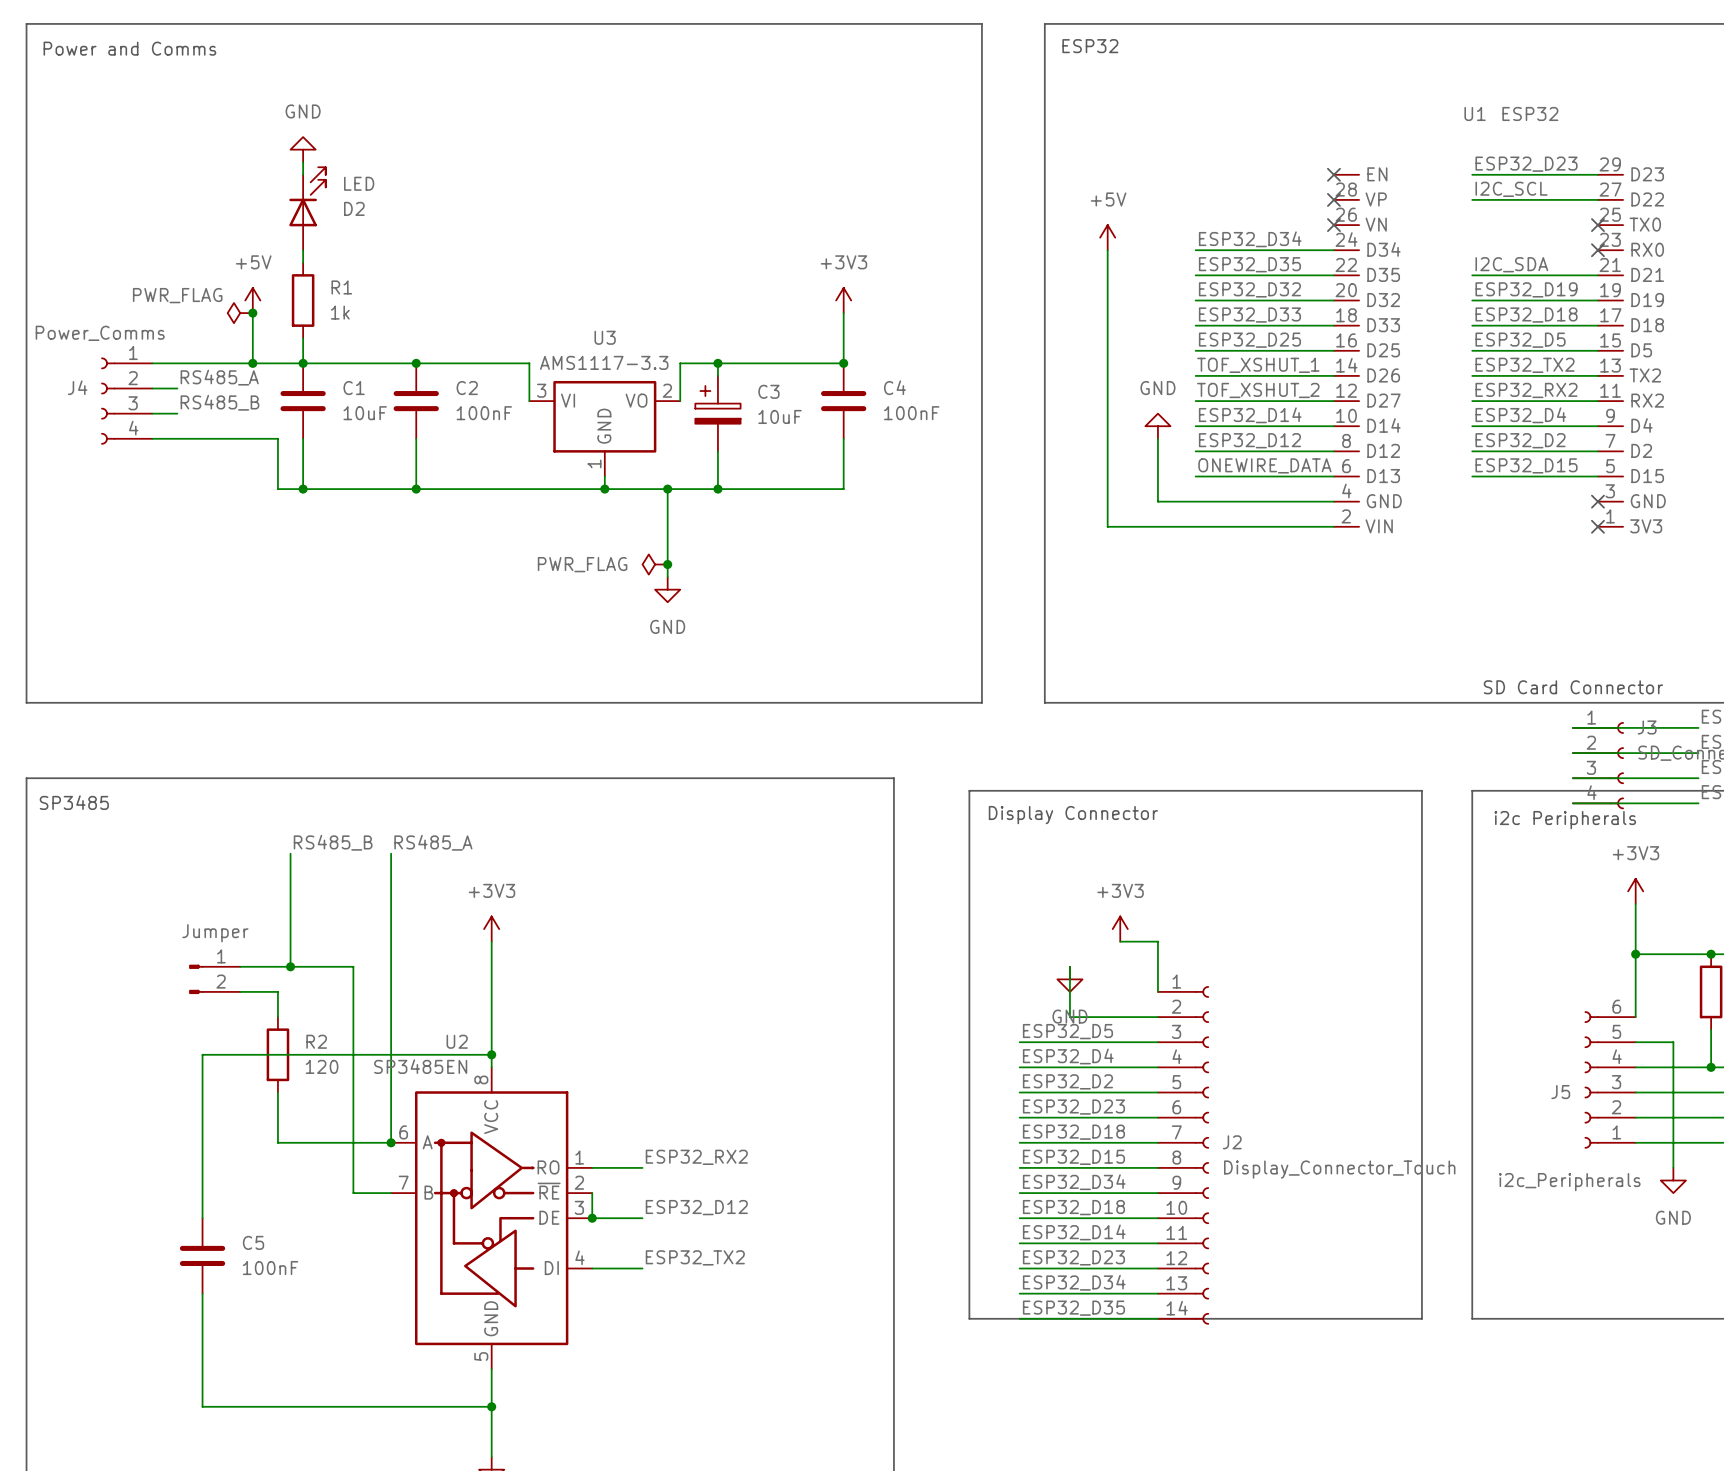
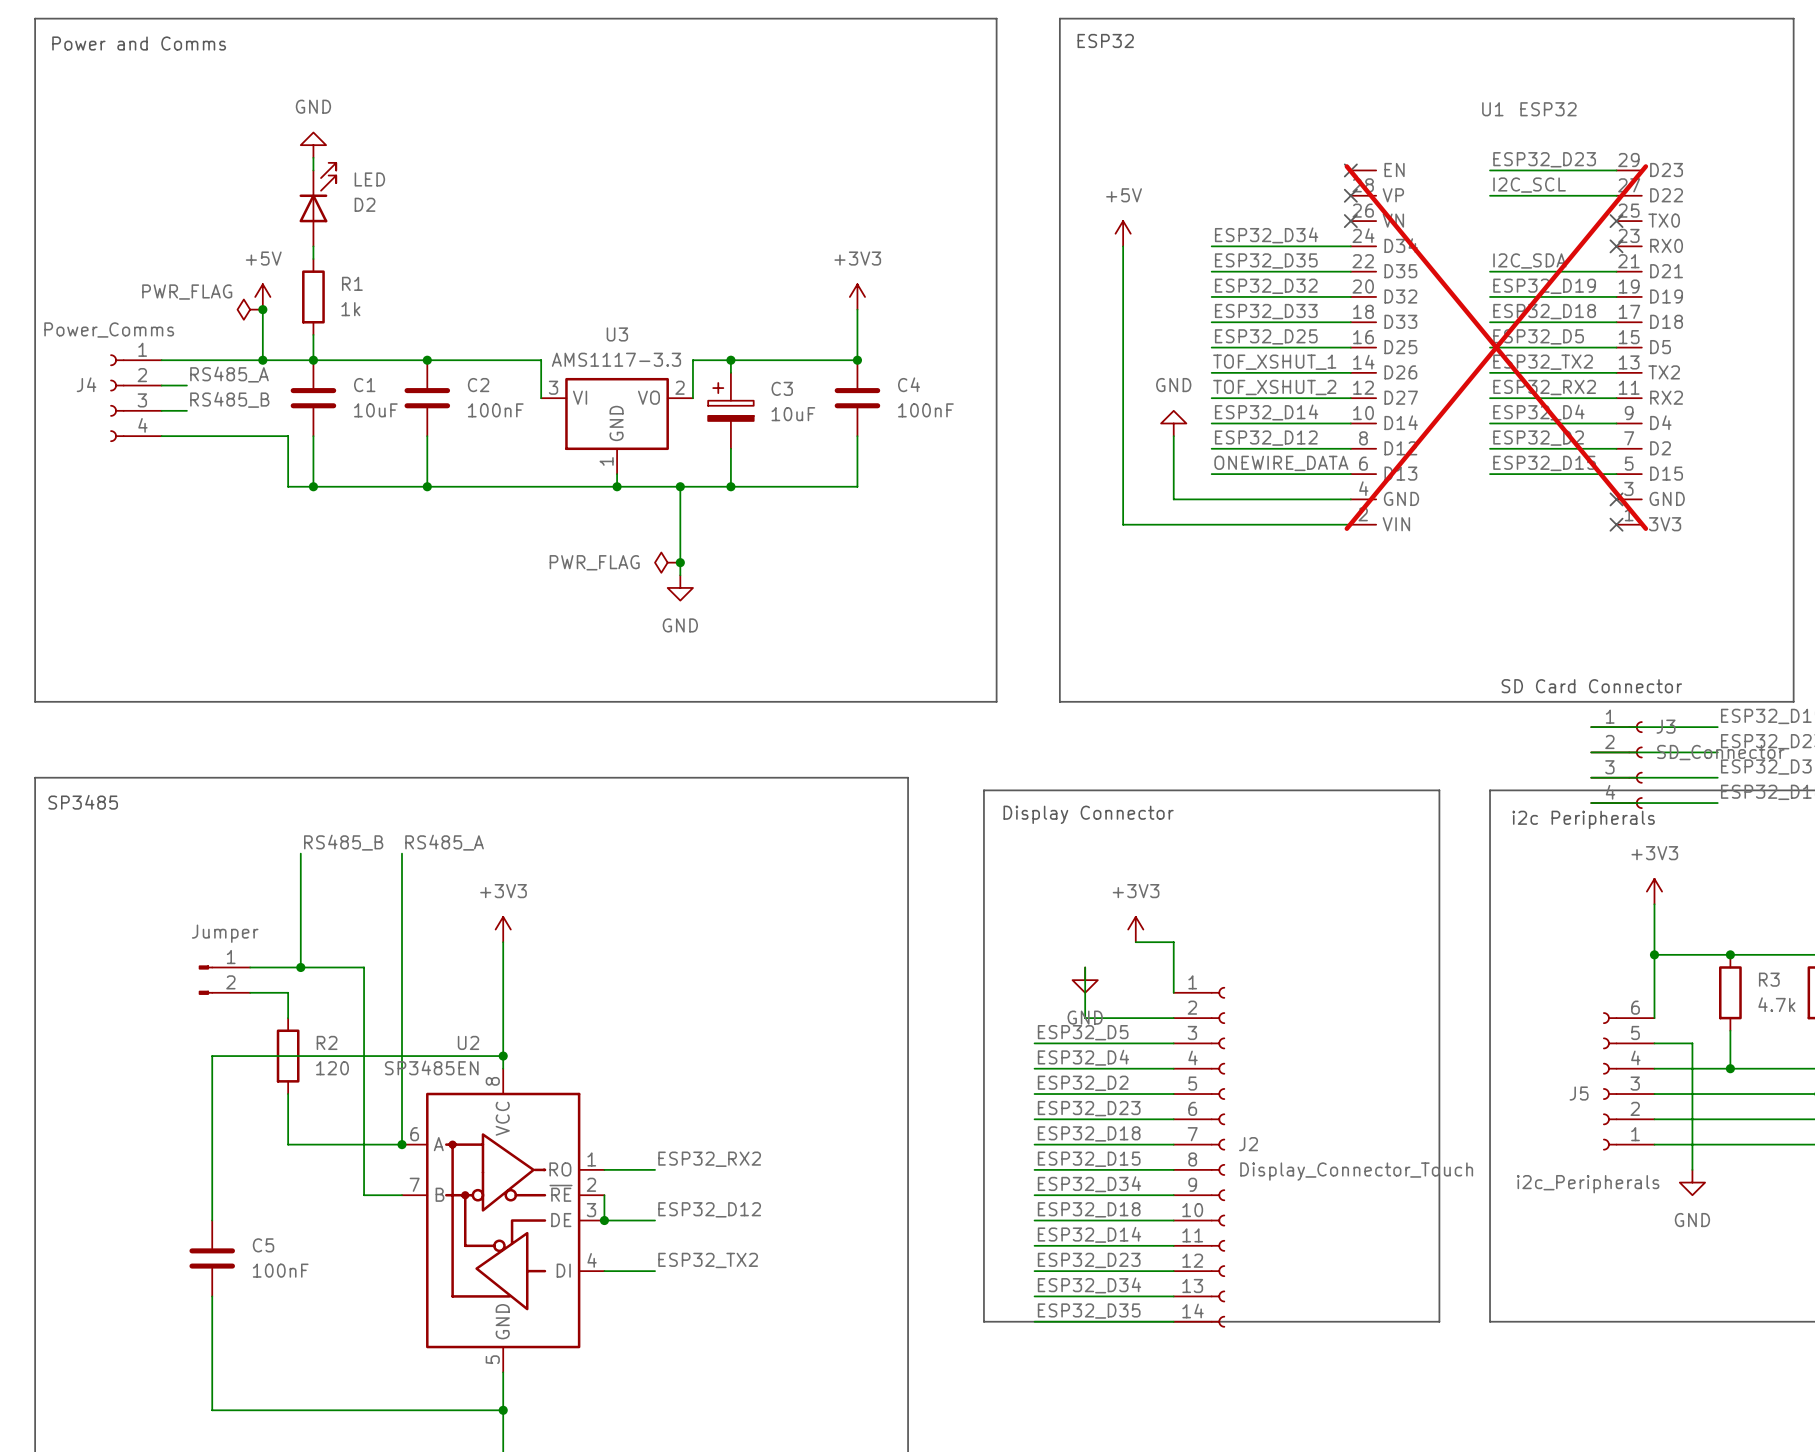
U1 do-not-place cross: none -> (1496, 347)

